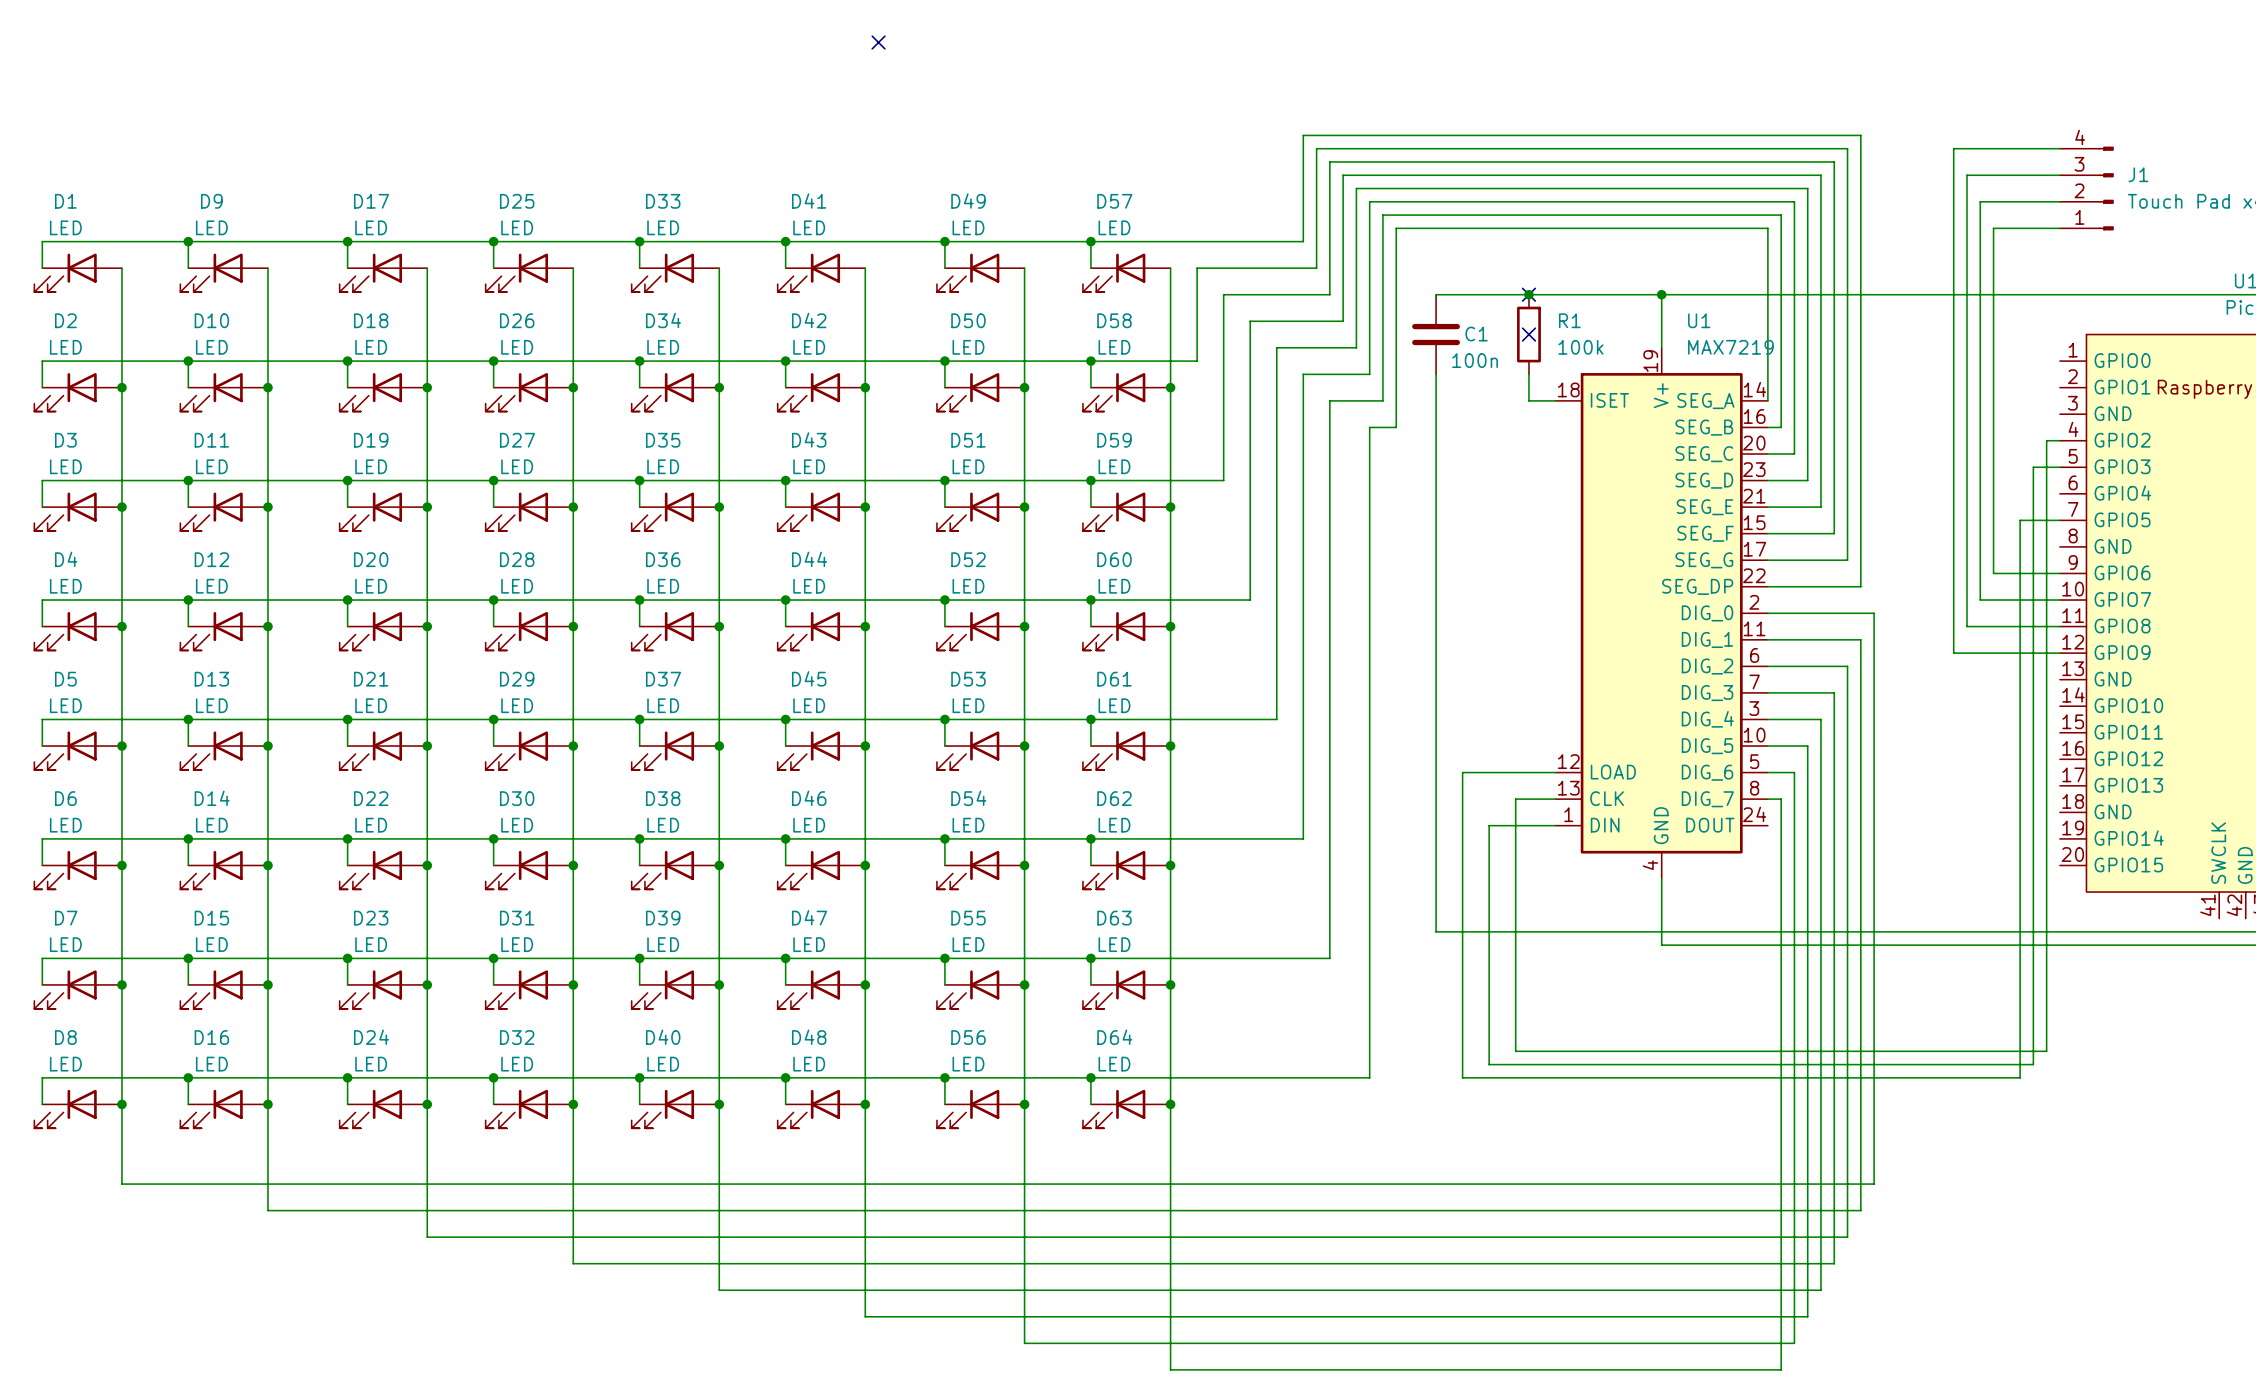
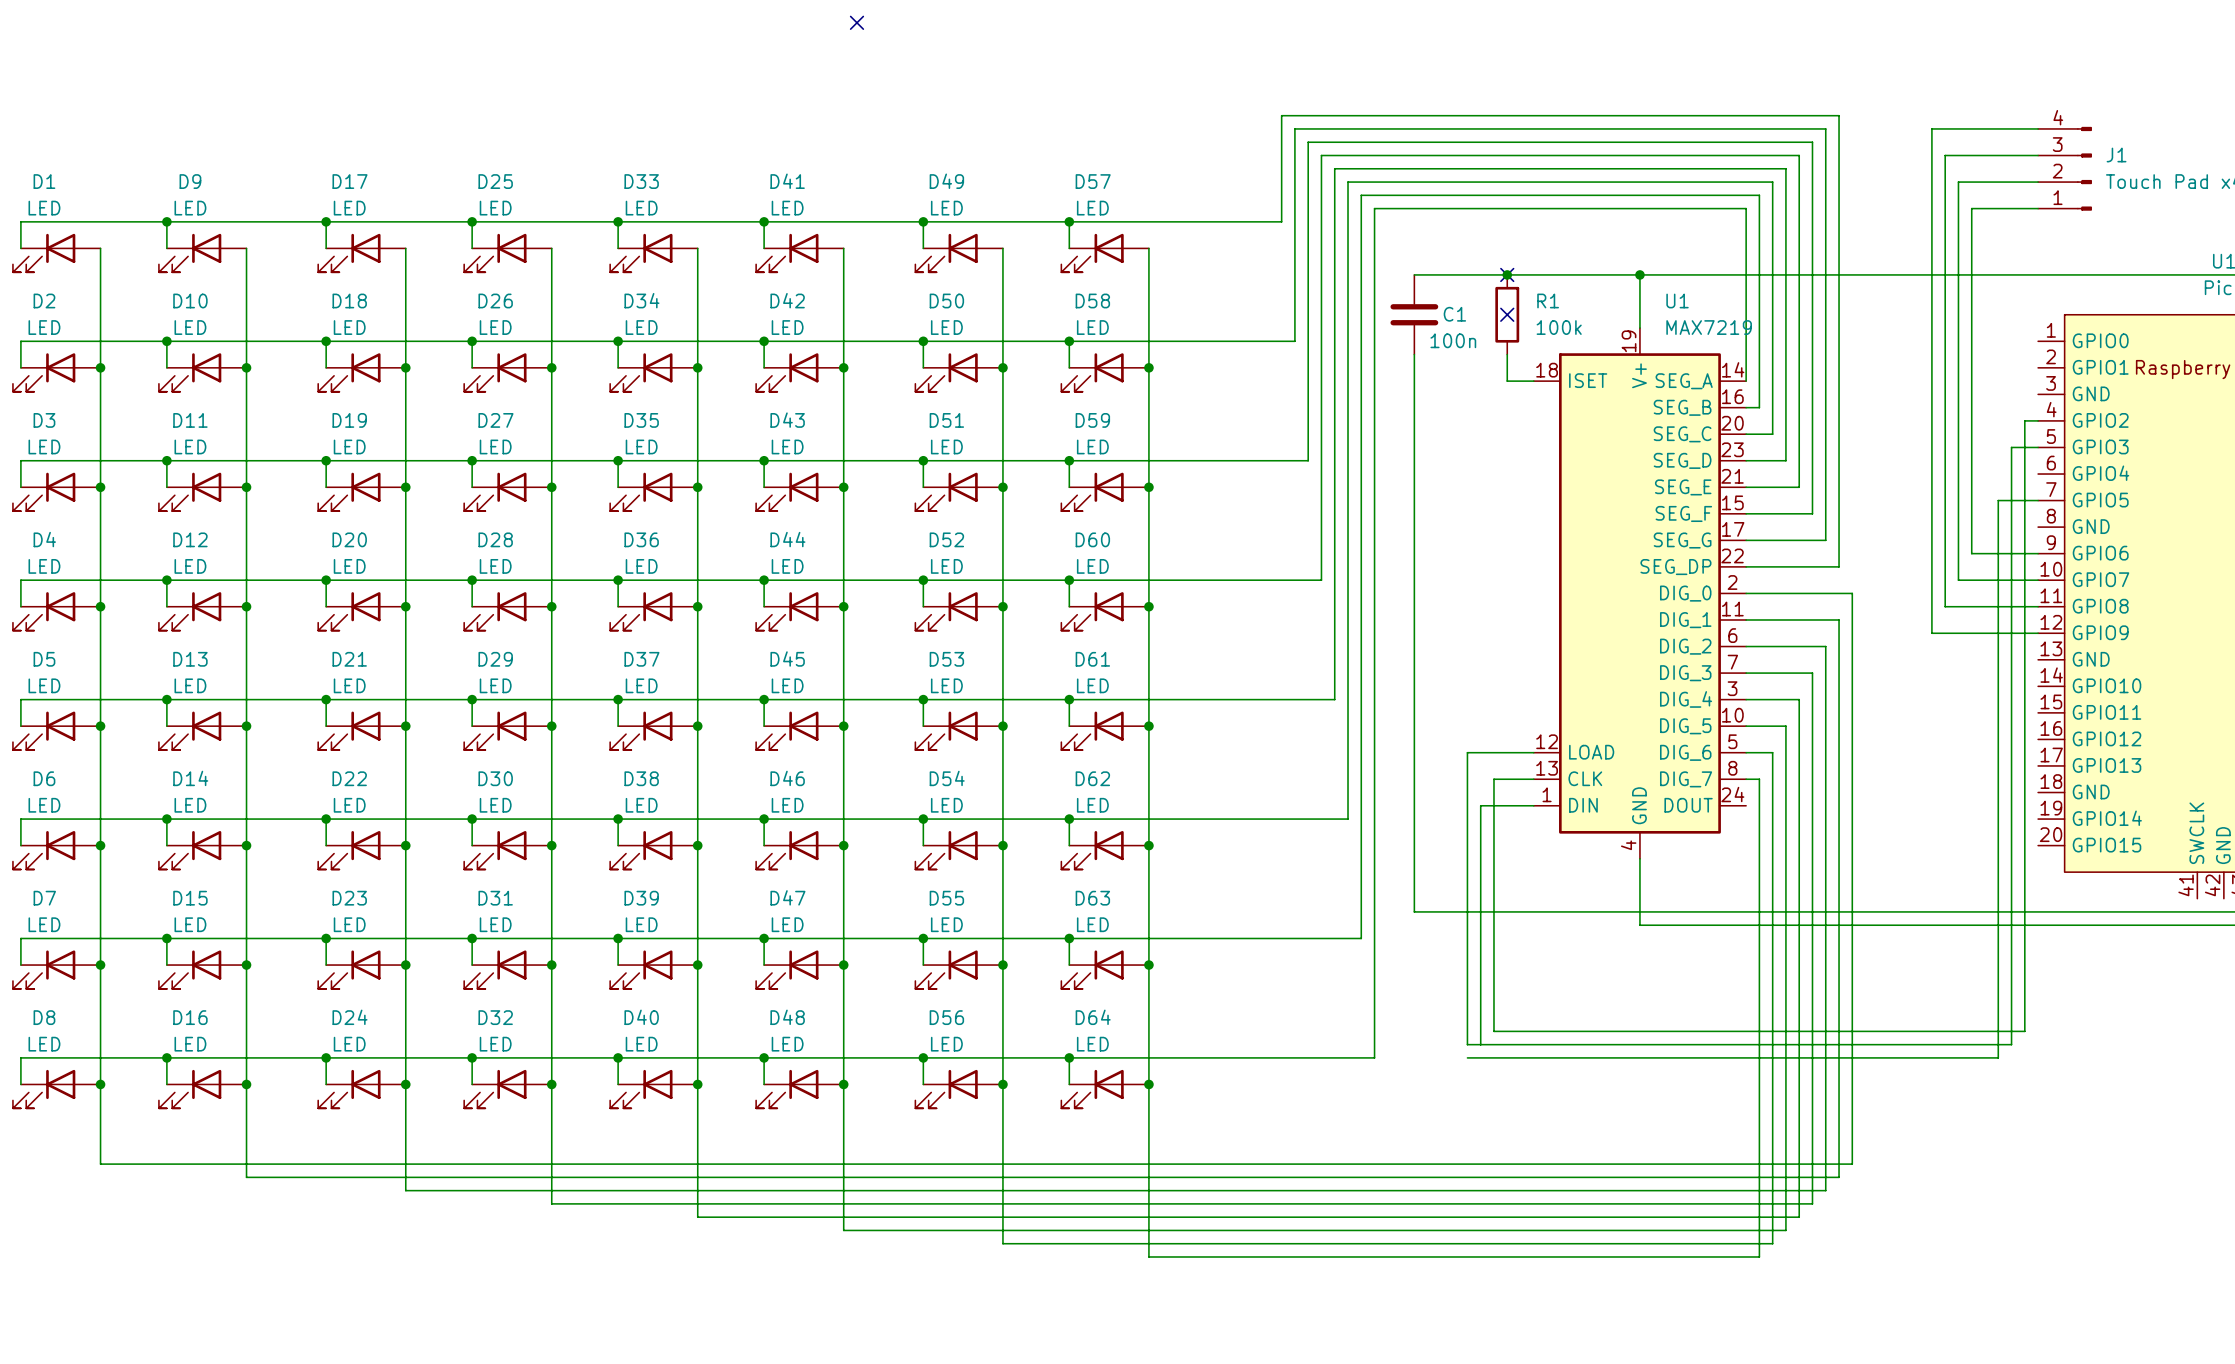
wire: (1316, 268) (1197, 268) (1197, 361) -> (1294, 248) (1294, 341) (1175, 341)
wire: (1329, 294) (1223, 294) (1223, 480) -> (1308, 460) (1202, 460)
wire: (1343, 321) (1250, 321) (1250, 600) -> (1321, 301) (1321, 580) (1228, 580)
wire: (1356, 347) (1276, 347) (1276, 719) -> (1334, 328) (1334, 699) (1255, 699)
wire: (1369, 374) (1303, 374) (1303, 838) -> none
wire: (1329, 400) (1382, 400) -> (1308, 381) (1308, 274)
wire: (1369, 427) (1396, 427) -> (1348, 407) (1348, 354)
wire: none -> (1374, 407) (1374, 1057) (1348, 1057)
wire: (1329, 480) (1329, 958) -> (1361, 381) (1361, 938) (1308, 938)
wire: (1489, 772) (1462, 772) (1462, 1077) (1489, 1077) -> none
wire: (1489, 825) (1502, 825) -> (1467, 805) (1467, 752)
wire: none -> (1480, 805) (1480, 1044)
wire: (1369, 838) (1369, 1077) -> (1348, 819) (1281, 819)
wire: (267, 1197) (267, 1210) (427, 1210) (427, 1237) (719, 1237) (719, 1290) (1820, 1290) (1820, 1237) (1847, 1237) (1847, 1210) (1860, 1210) (1860, 1197) -> (246, 1177) (1839, 1177)
wire: (573, 1223) (573, 1263) (1024, 1263) (1024, 1343) (1794, 1343) (1794, 1263) (1834, 1263) (1834, 1223) -> (551, 1203) (1812, 1203)
wire: (865, 1250) (865, 1316) (1807, 1316) (1807, 1250) -> (843, 1230) (1785, 1230)
wire: (1170, 1276) (1170, 1369) (1781, 1369) (1781, 1276) -> (1148, 1256) (1759, 1256)

